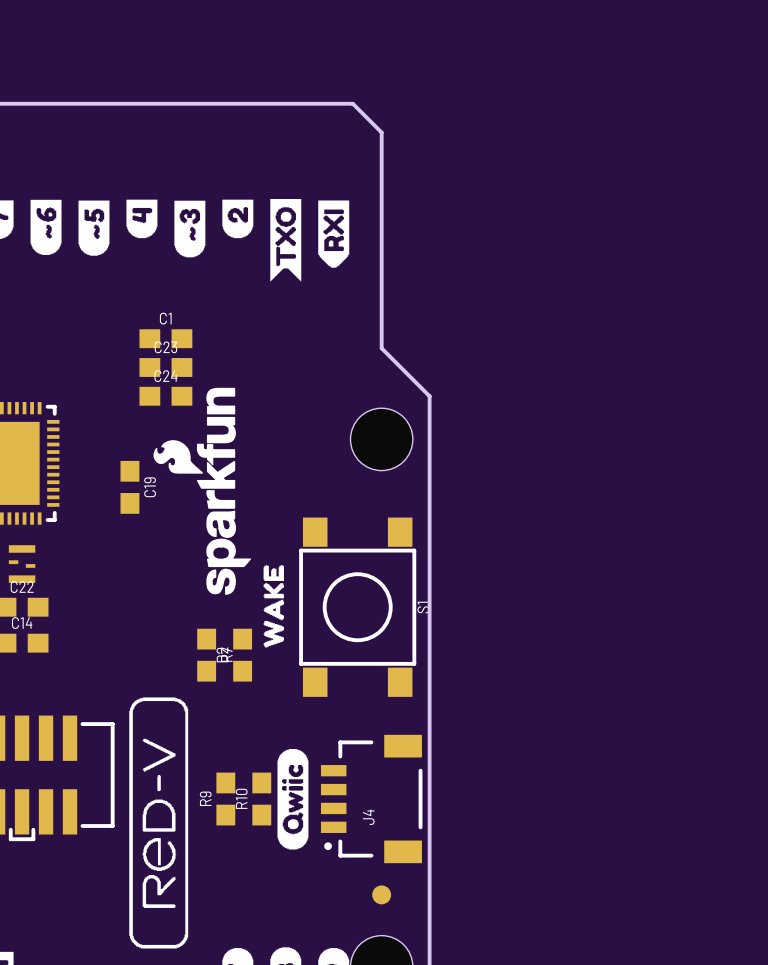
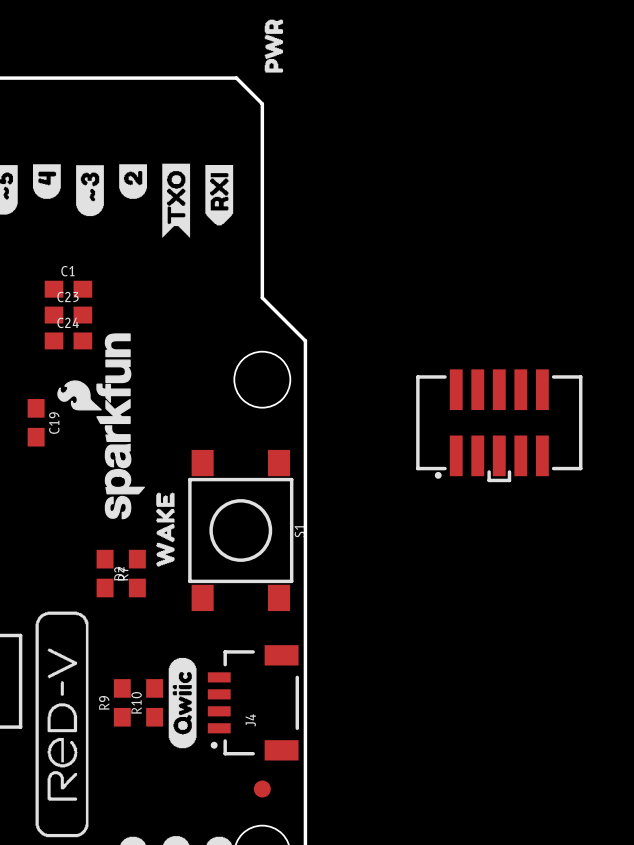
drawing: none -> [264, 19, 284, 73]
part: none -> (499, 425)

